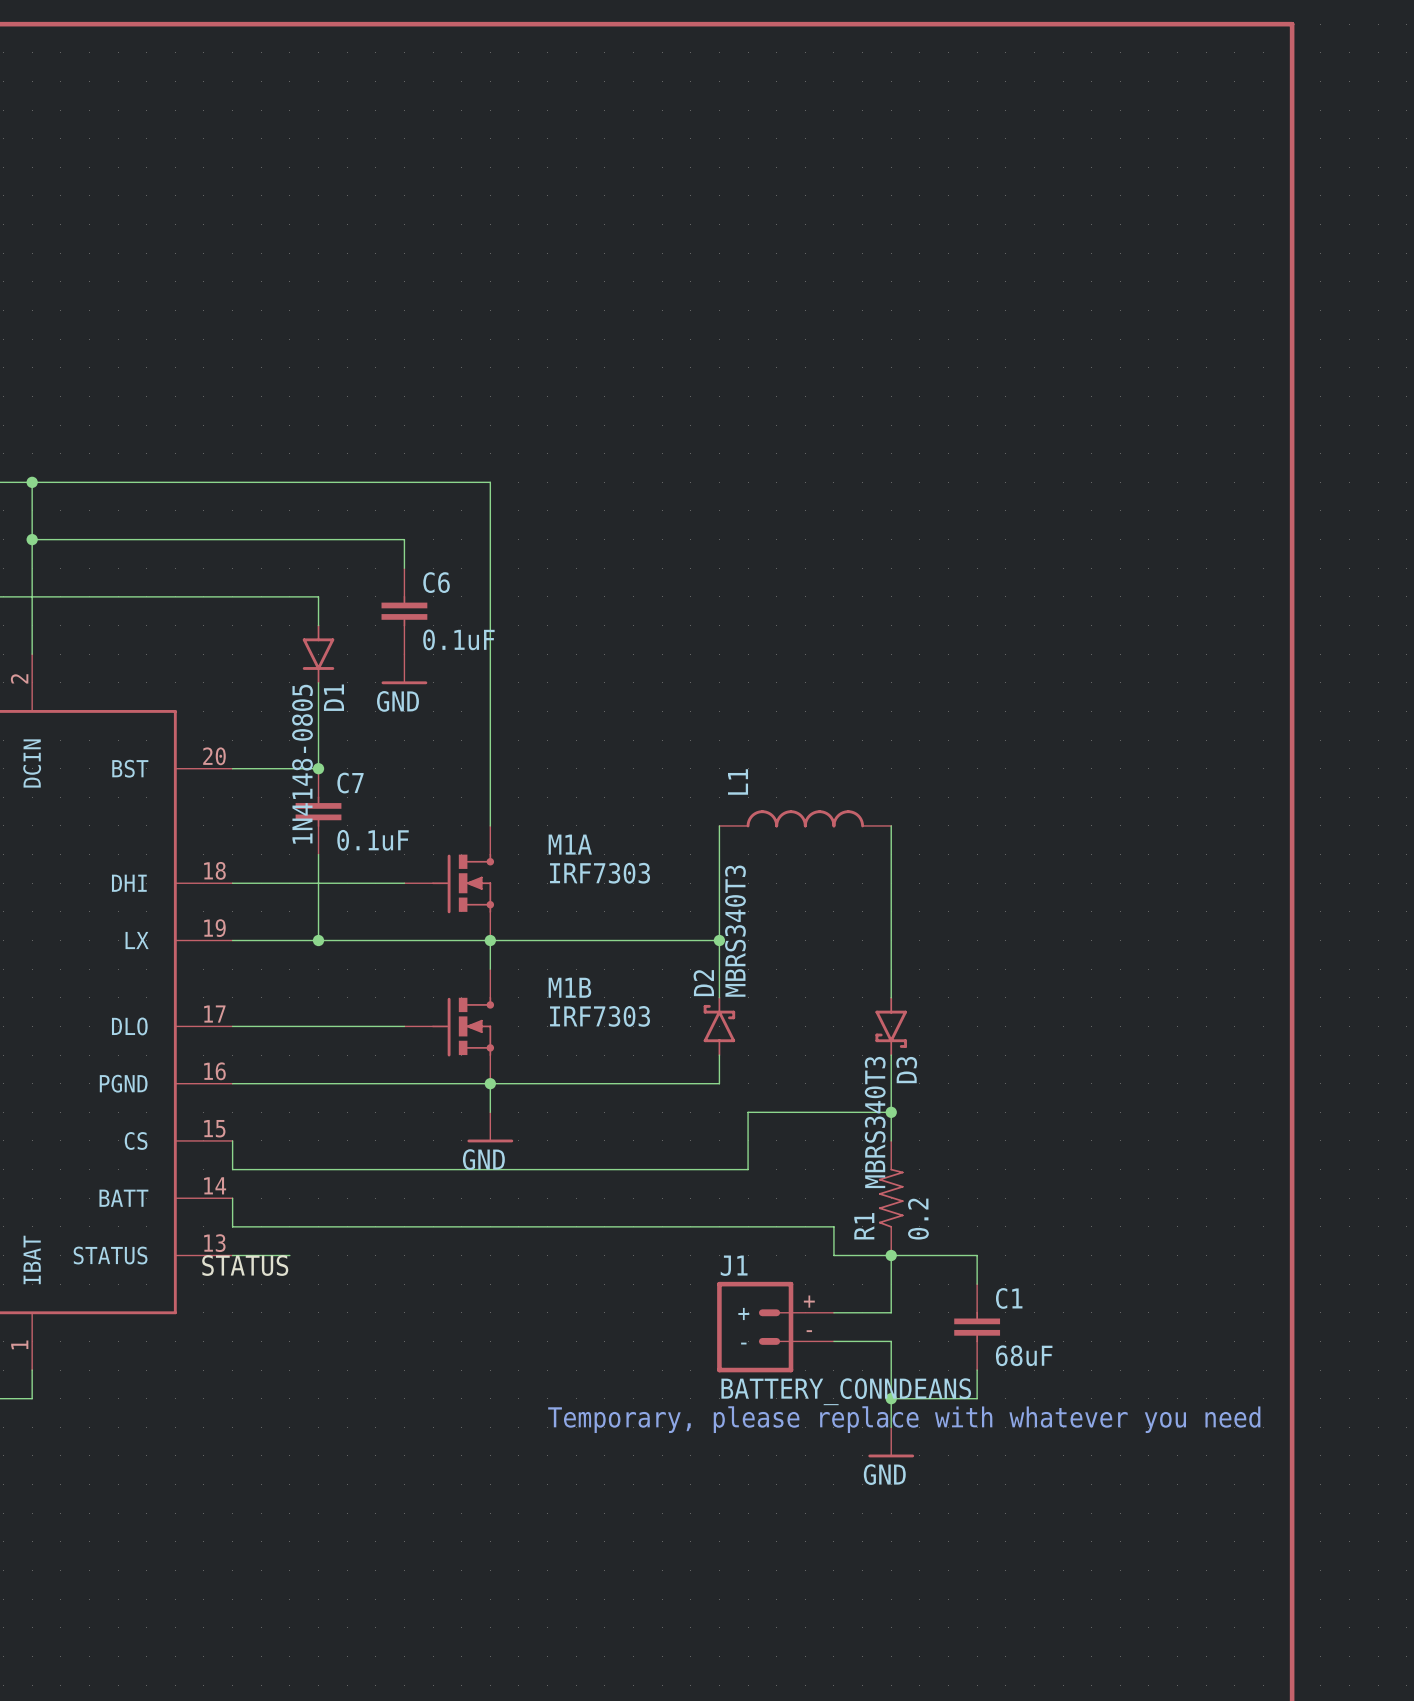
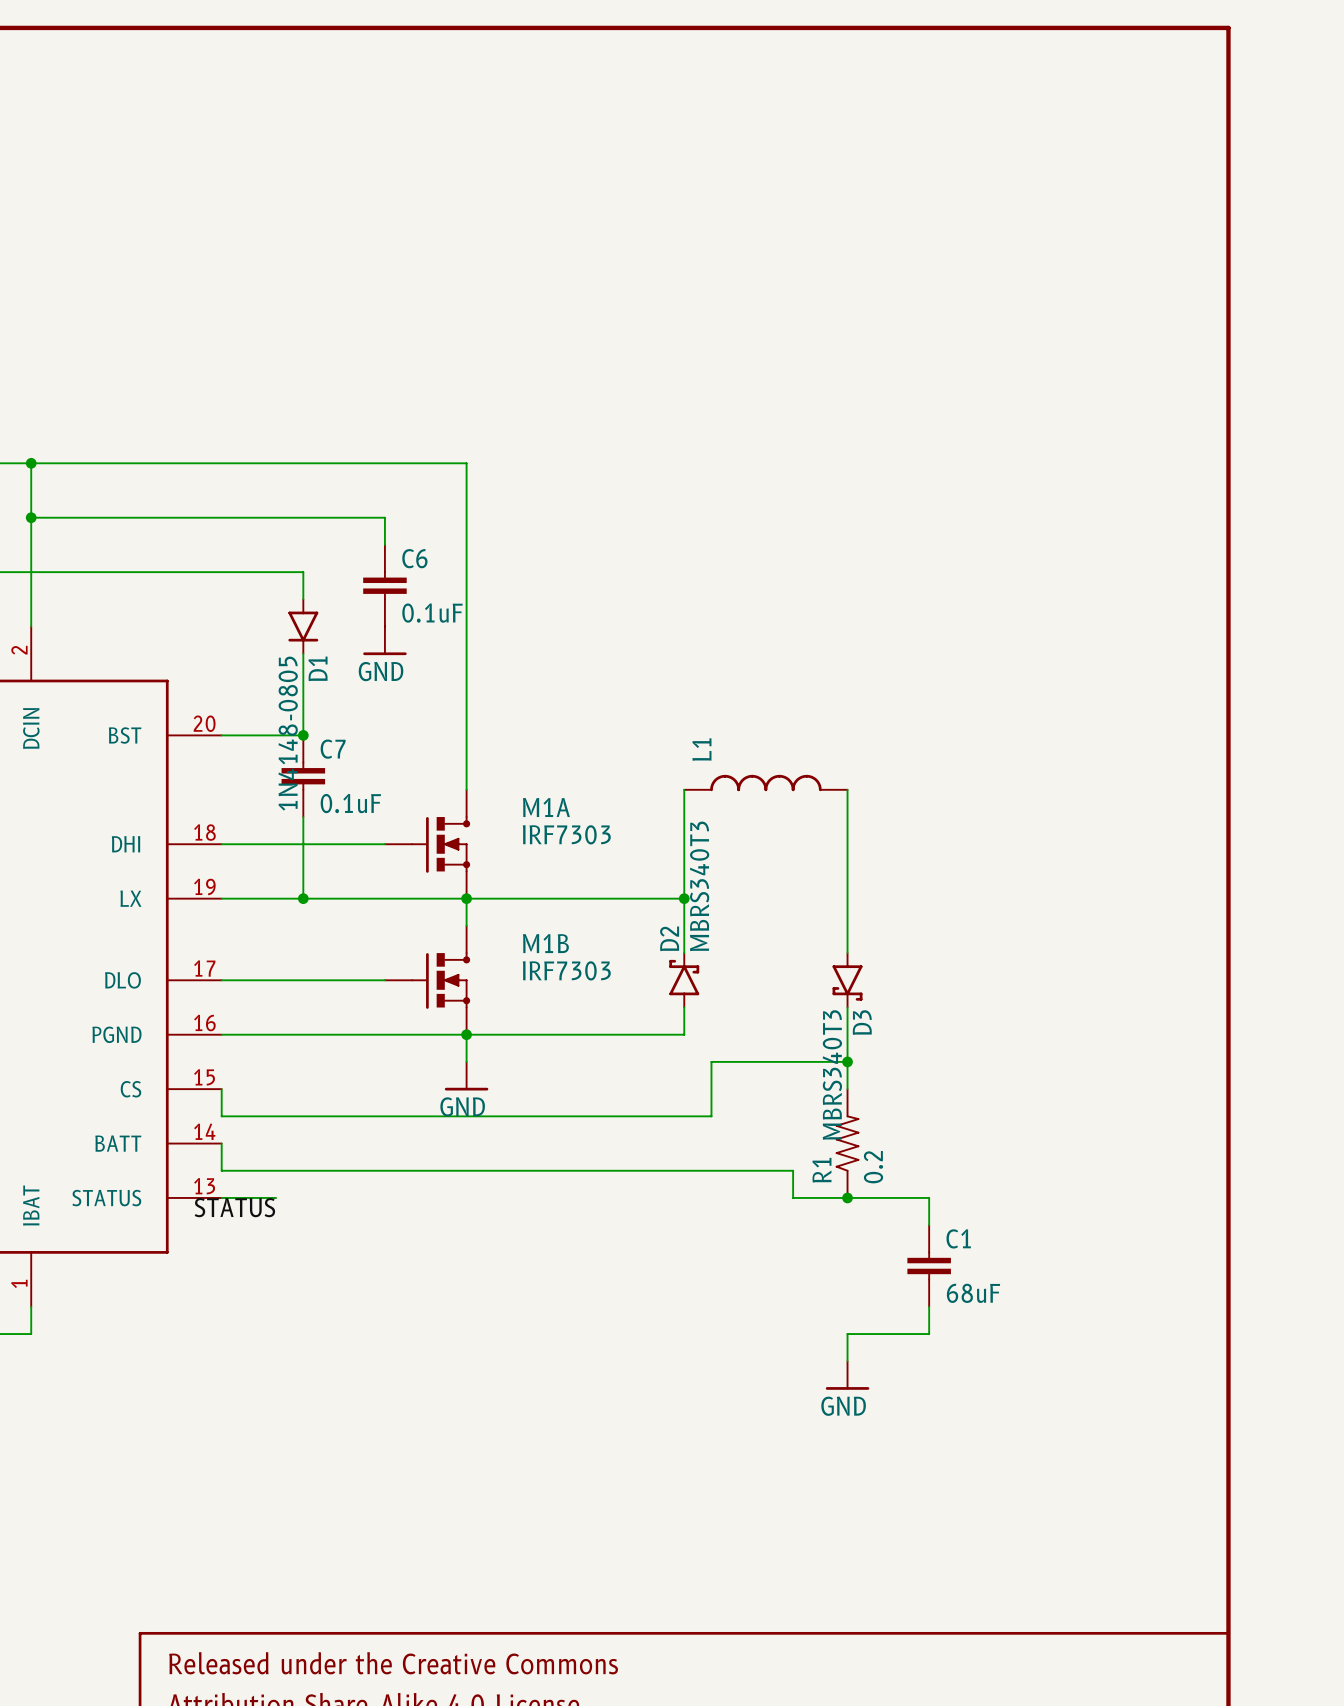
wire: (891, 1255) (891, 1312) (833, 1312) -> none
J1: BATTERY_CONNDEANS (775, 1327) -> none
wire: (833, 1341) (891, 1341) (891, 1398) -> none
junction: (891, 1398) -> none
text: Temporary, please replace with whatever you need (904, 1419) -> none

